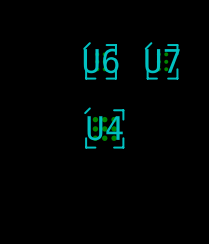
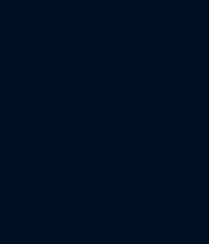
U6: (100, 60) -> none
U7: (161, 60) -> none
U4: (104, 127) -> none

